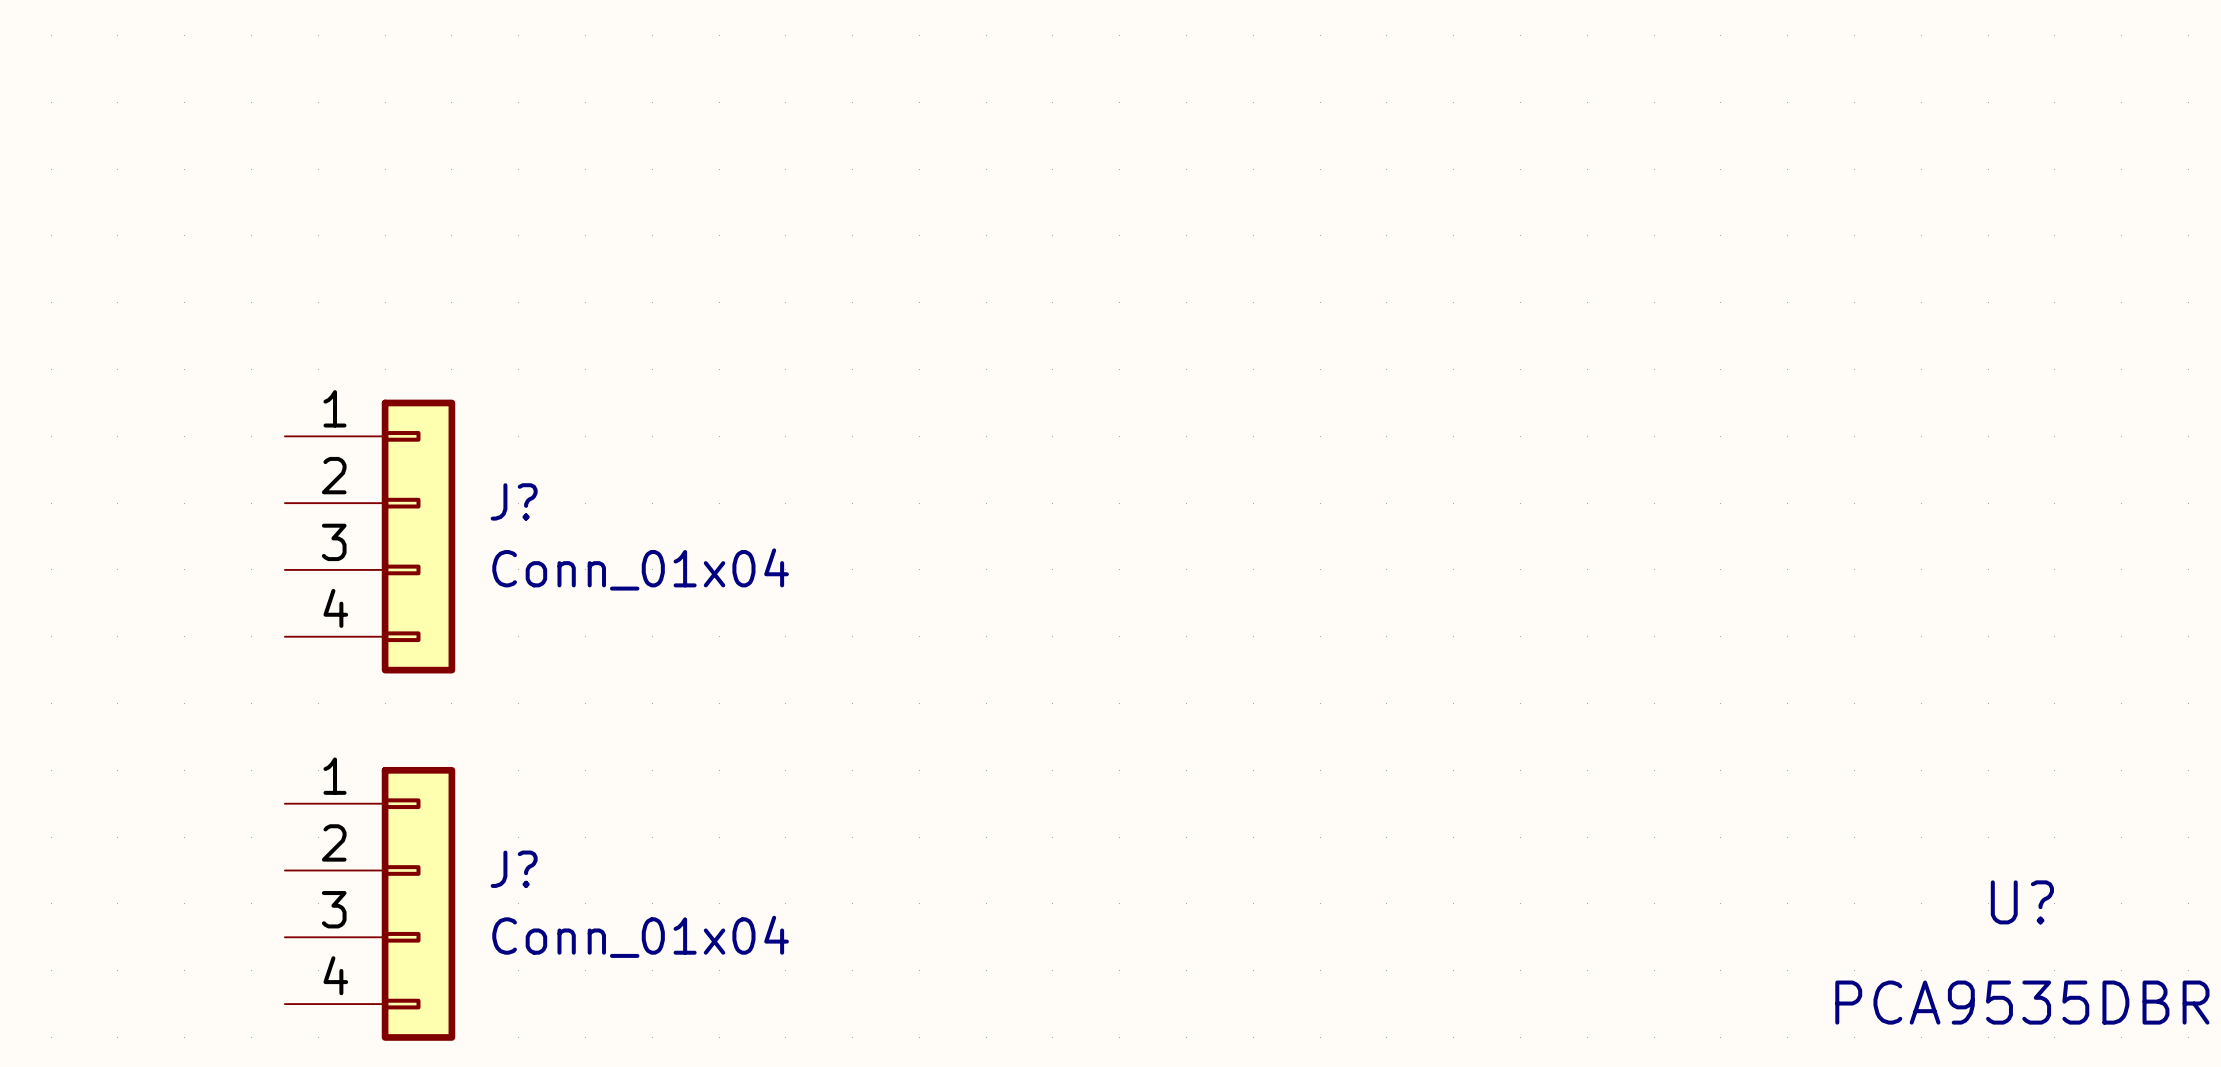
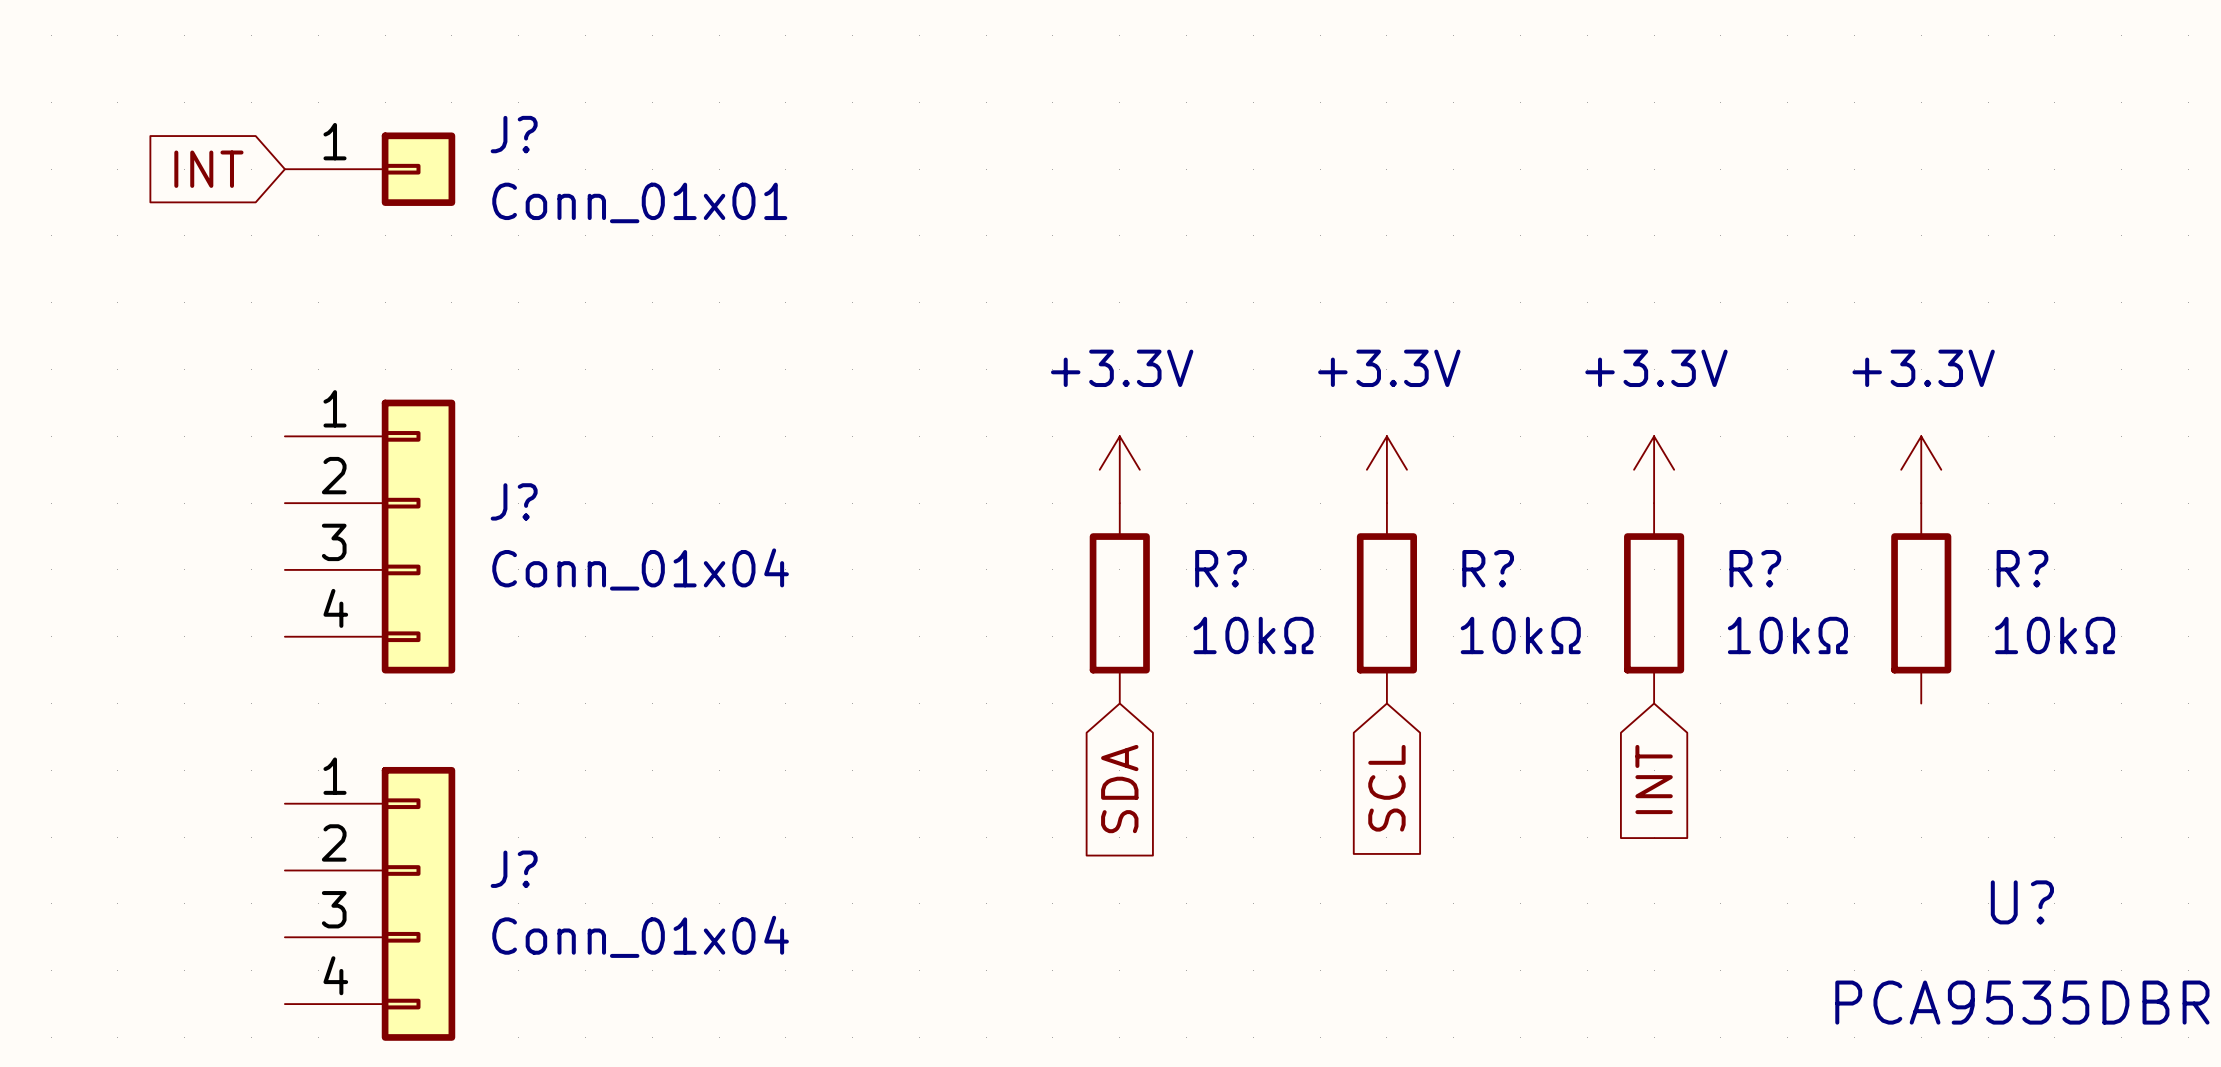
global label: none -> INT (208, 169)
J?: none -> Conn_01x01 (370, 169)
power symbol: none -> +3.3V (1119, 469)
power symbol: none -> +3.3V (1386, 469)
power symbol: none -> +3.3V (1654, 469)
power symbol: none -> +3.3V (1921, 469)
R?: none -> 10kΩ (1119, 603)
R?: none -> 10kΩ (1386, 603)
R?: none -> 10kΩ (1654, 603)
R?: none -> 10kΩ (1921, 603)
global label: none -> INT (1654, 779)
global label: none -> SCL (1386, 788)
global label: none -> SDA (1119, 789)

